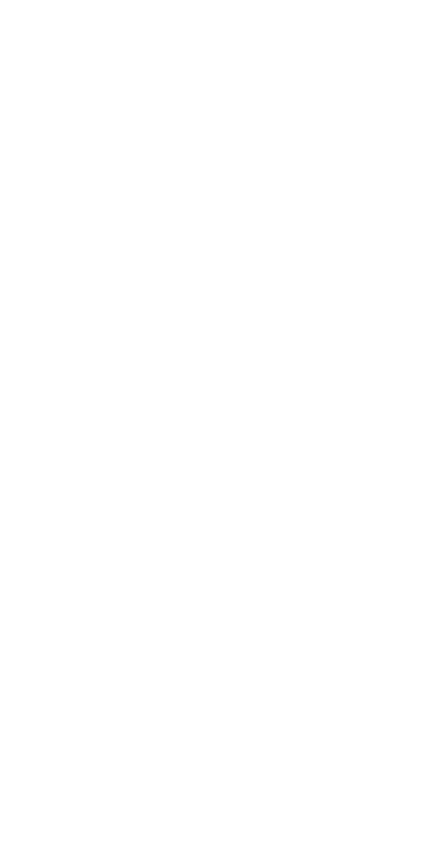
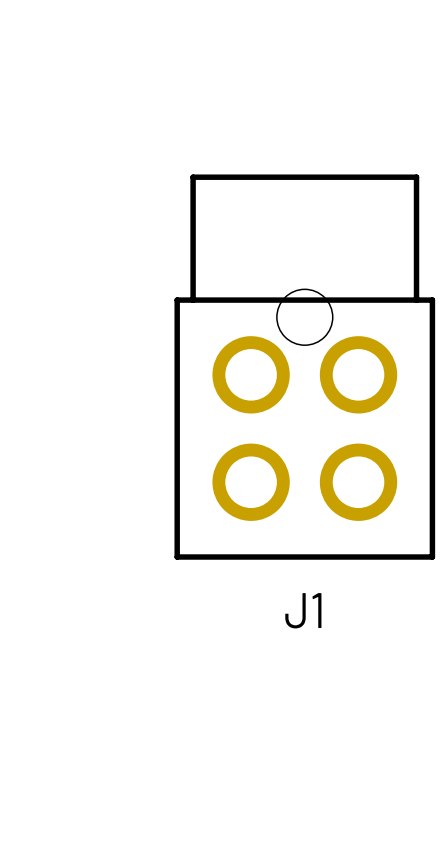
J1: none -> (304, 367)

